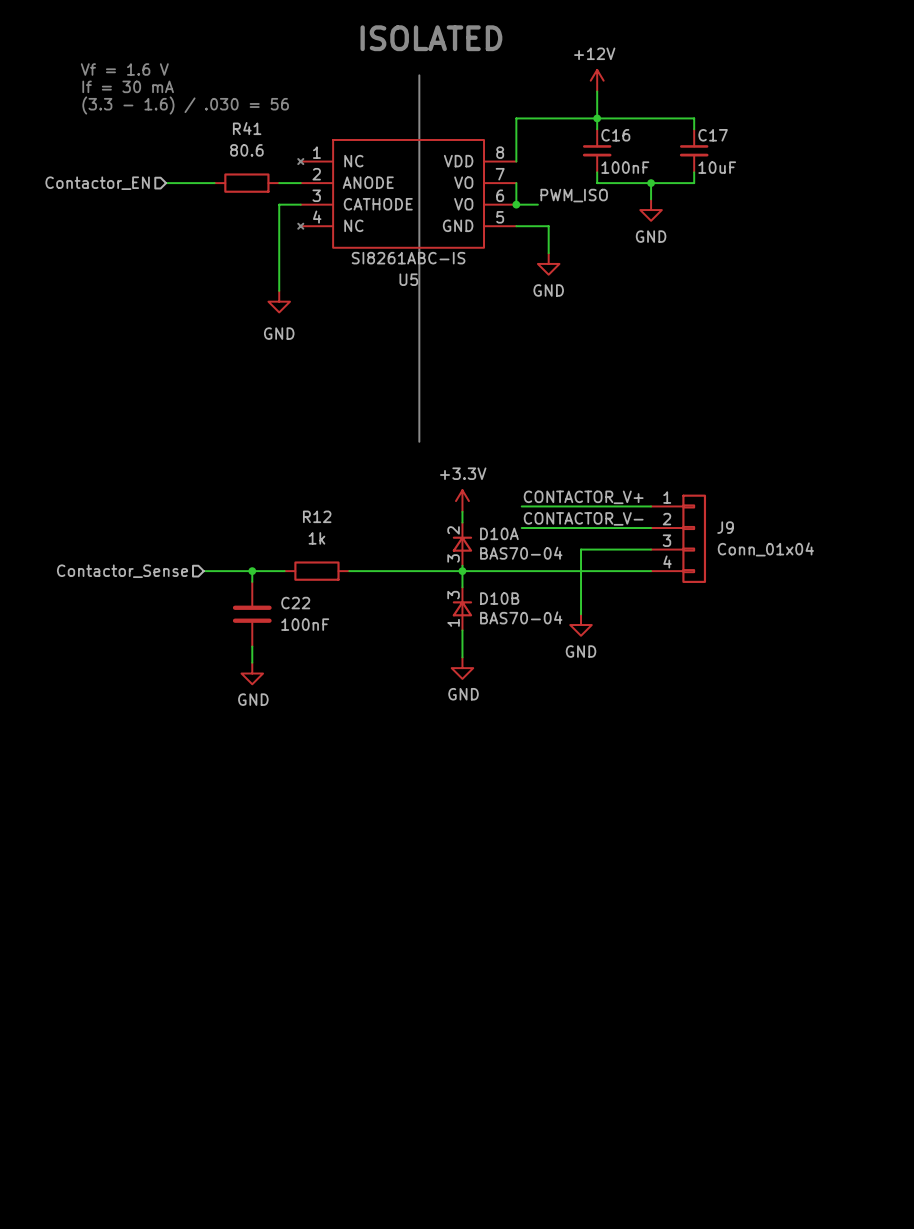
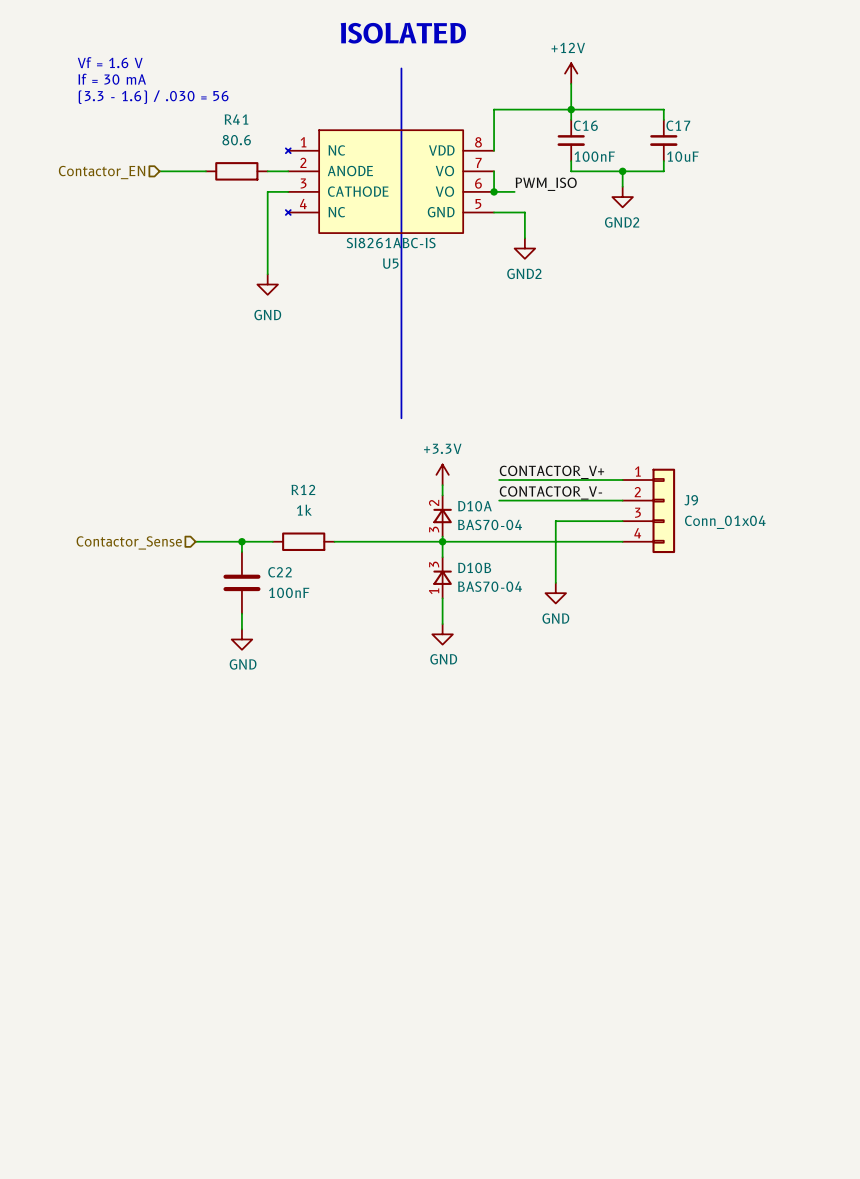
power symbol: GND (651, 210) -> GND2 (622, 197)
power symbol: GND (548, 263) -> GND2 (524, 248)

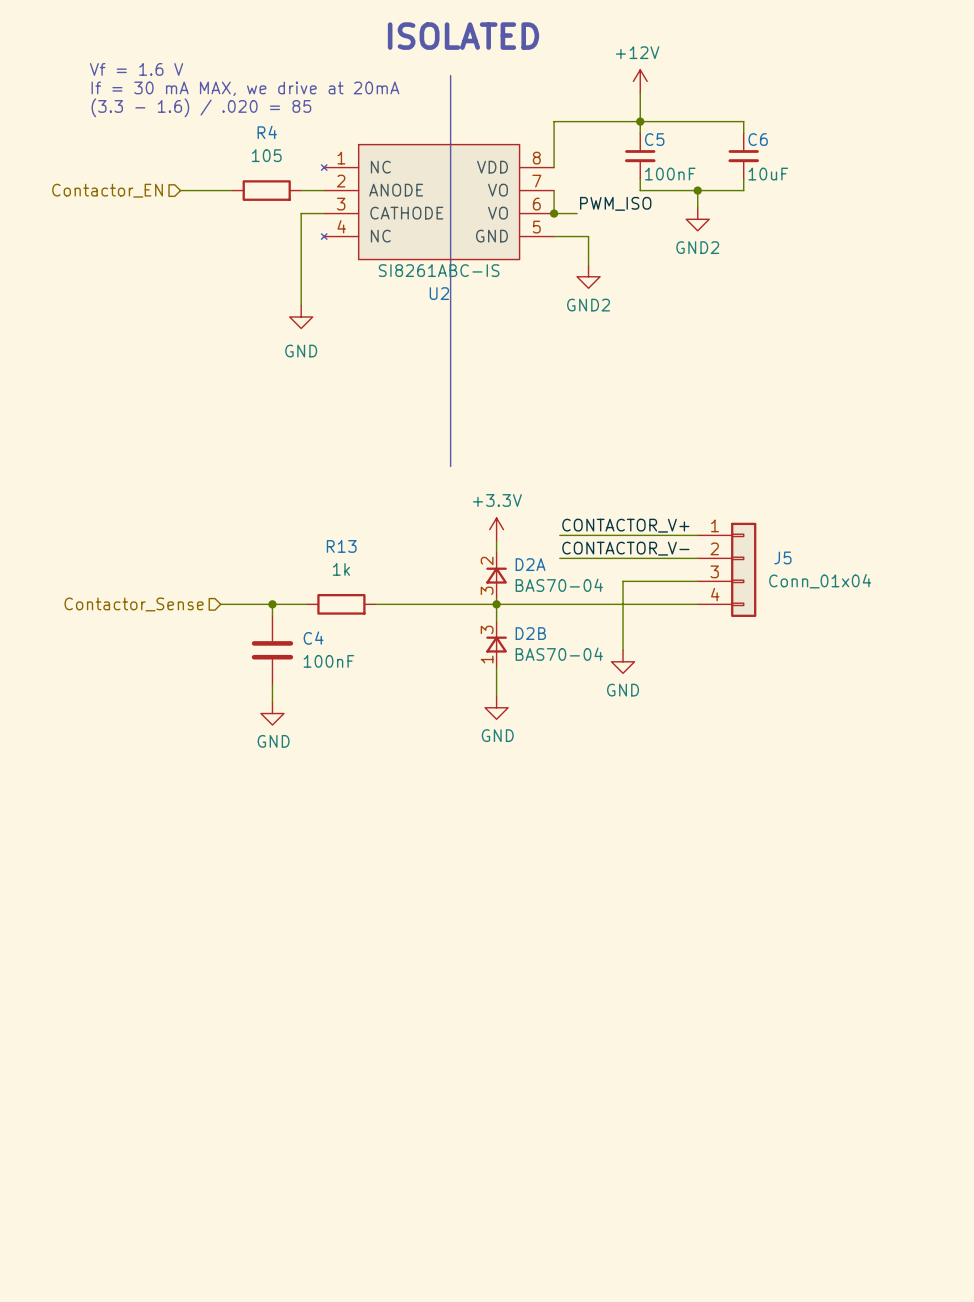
text: If = 30 mA (112, 79) -> If = 30 mA MAX, we drive at 20mA (245, 88)
text: (3.3 - 1.6) / .030 = 56 (153, 97) -> (3.3 - 1.6) / .020 = 85 (201, 107)
R41 name: R41 (236, 119) -> R4 (267, 132)
C16 name: C16 (585, 125) -> C5 (654, 139)
C17 name: C17 (678, 125) -> C6 (758, 139)
R41 value: 80.6 (236, 140) -> 105 (266, 155)
U5 name: U5 (390, 263) -> U2 (439, 293)
R12 name: R12 (303, 489) -> R13 (341, 546)
J9 name: J9 (691, 500) -> J5 (782, 557)
D10A name: D10A (474, 506) -> D2A (530, 564)
D10B name: D10B (474, 567) -> D2B (530, 633)
C22 name: C22 (280, 572) -> C4 (313, 638)

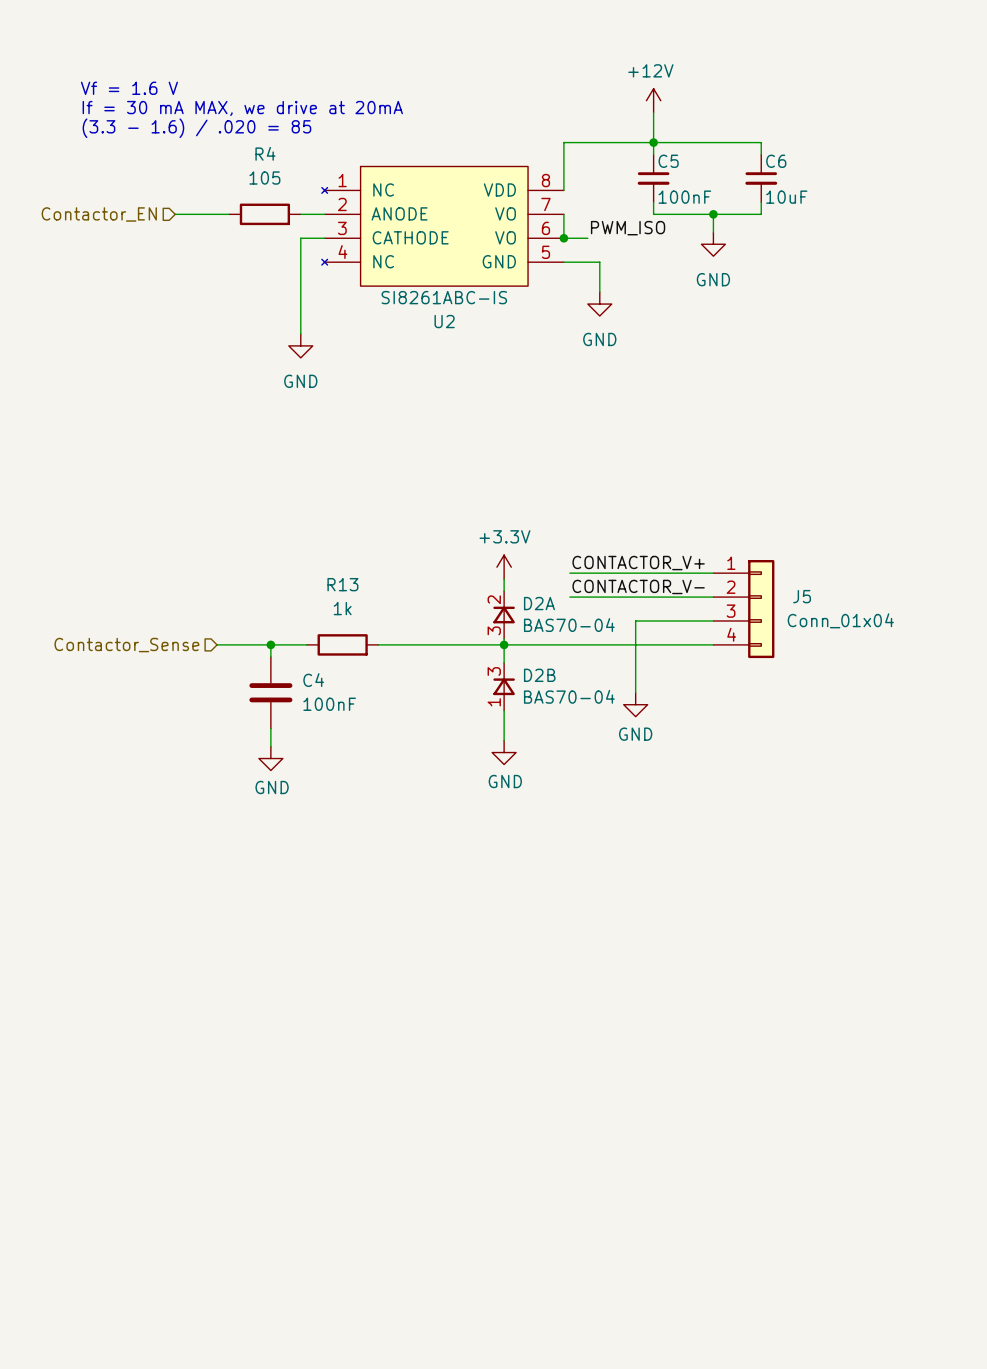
text: ISOLATED (463, 36) -> none
line: (450, 75) (450, 466) -> none
power symbol: GND2 (697, 219) -> GND (713, 244)
power symbol: GND2 (588, 276) -> GND (599, 304)

